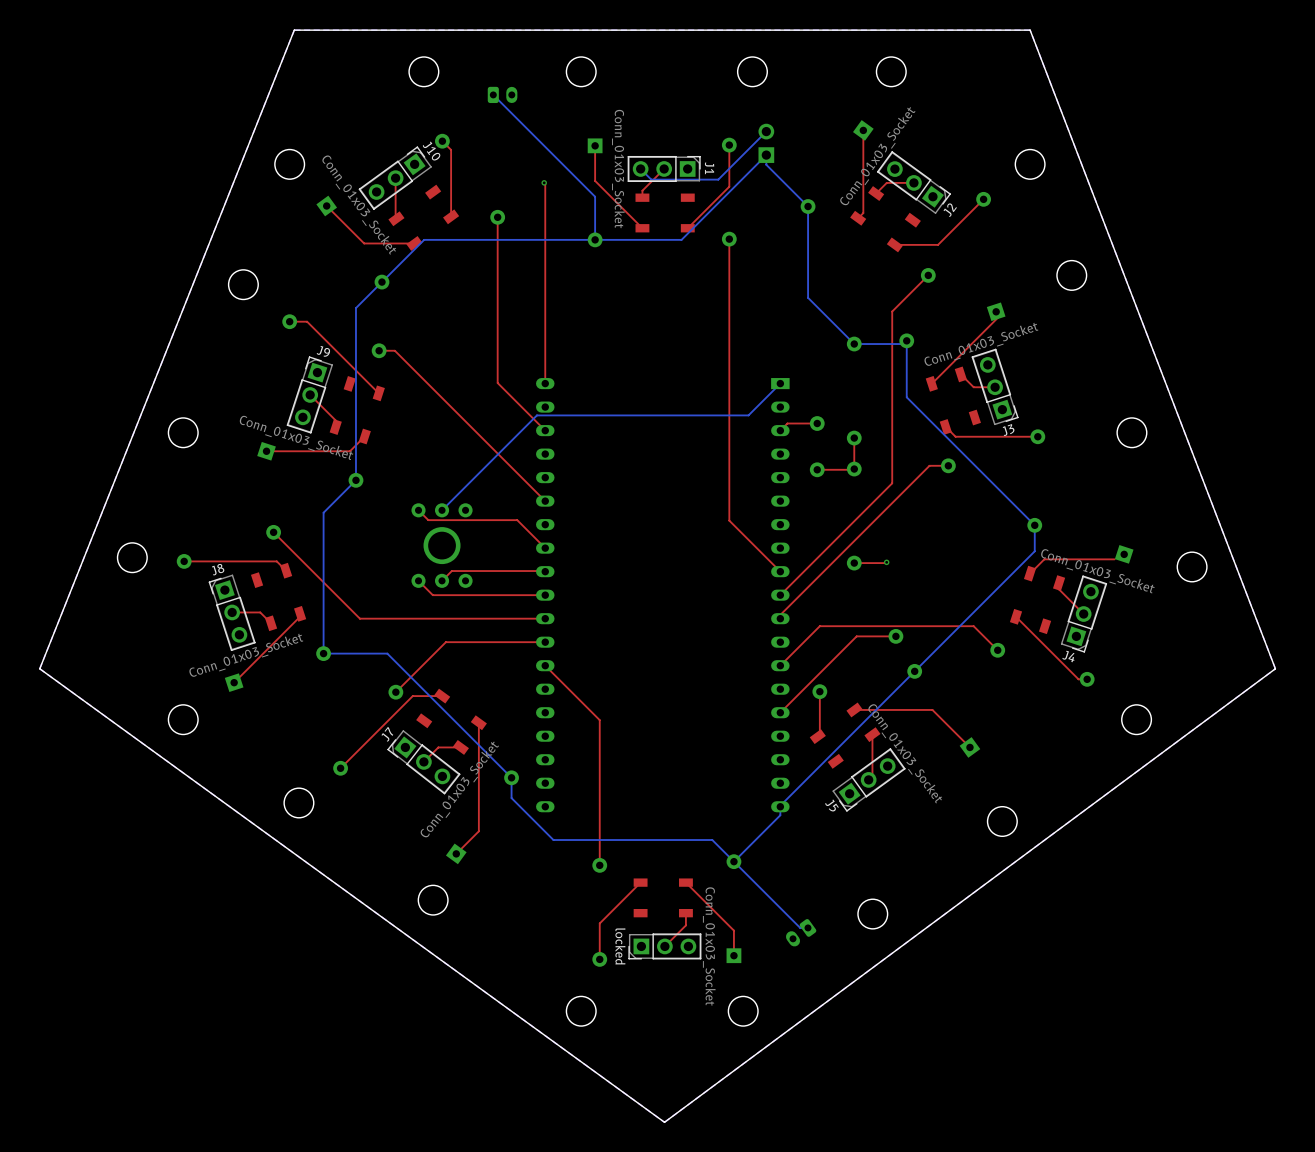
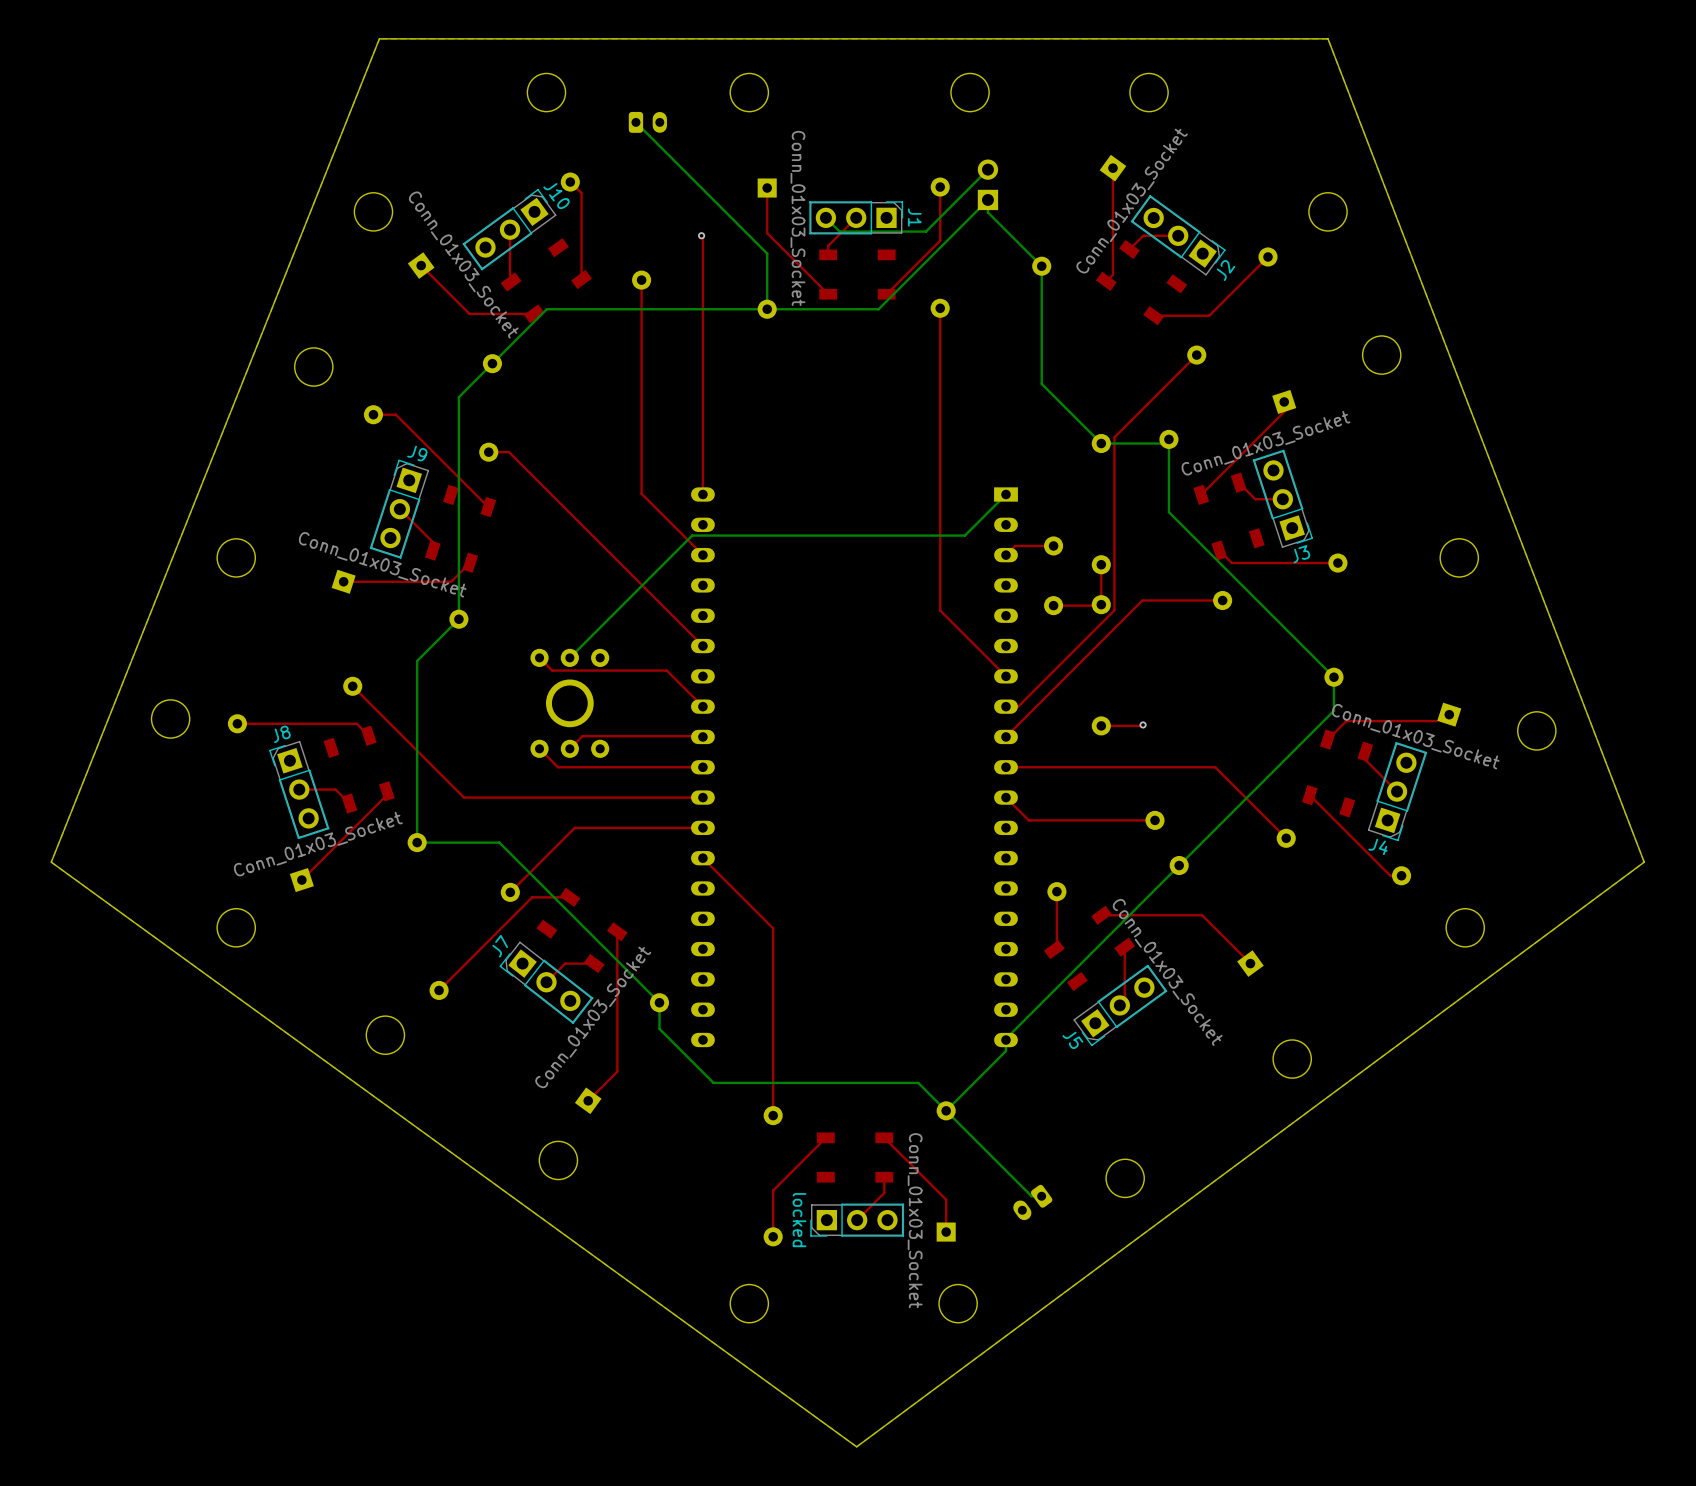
top track: (892, 311) (892, 483) (780, 595) -> (1150, 401) (1114, 437) (1114, 610) (1018, 706) (1006, 706)
top track: (929, 465) (780, 614) (780, 618) -> (1198, 600) (1142, 600) (1006, 736)
top track: (729, 473) (729, 520) (780, 571) -> (940, 610) (1006, 676)
top track: (973, 626) (819, 626) (780, 665) -> (1255, 807) (1215, 767) (1006, 767)
top track: (856, 636) (780, 712) -> (1104, 820) (1028, 820) (1006, 797)

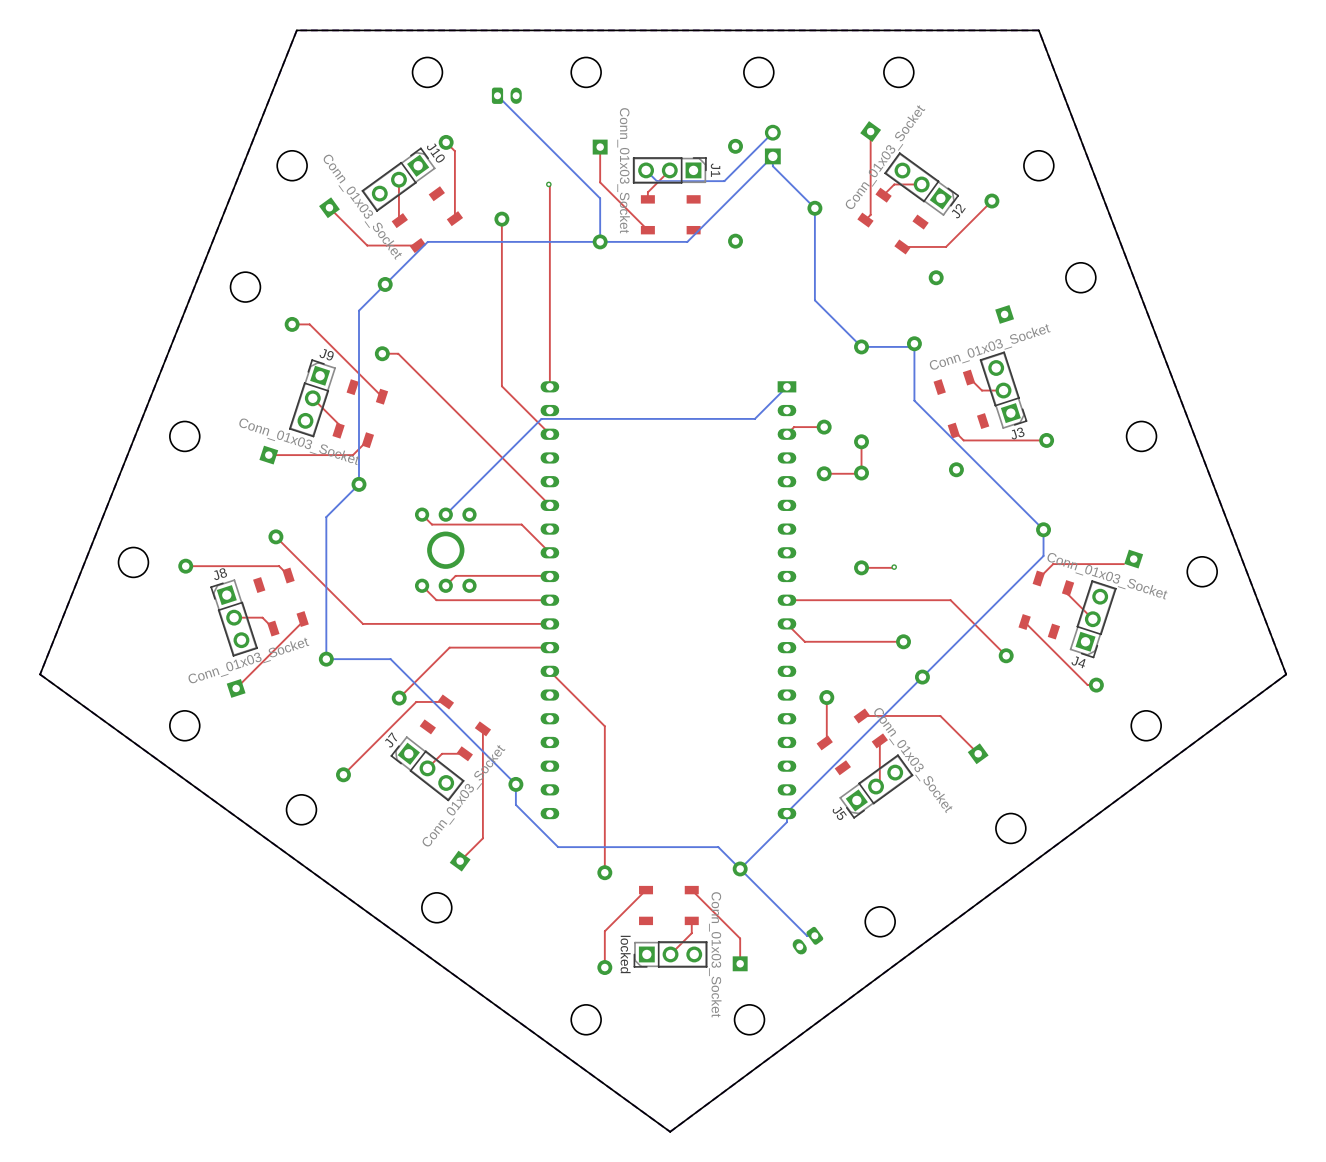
top track: (940, 187) (940, 240) (886, 294) -> none
top track: (940, 308) (940, 610) (1006, 676) -> none
top track: (1196, 355) (1114, 437) (1114, 610) (1016, 706) -> none
top track: (1284, 401) (1286, 402) (1286, 409) (1201, 494) -> none
top track: (1222, 600) (1142, 600) (1006, 736) -> none

